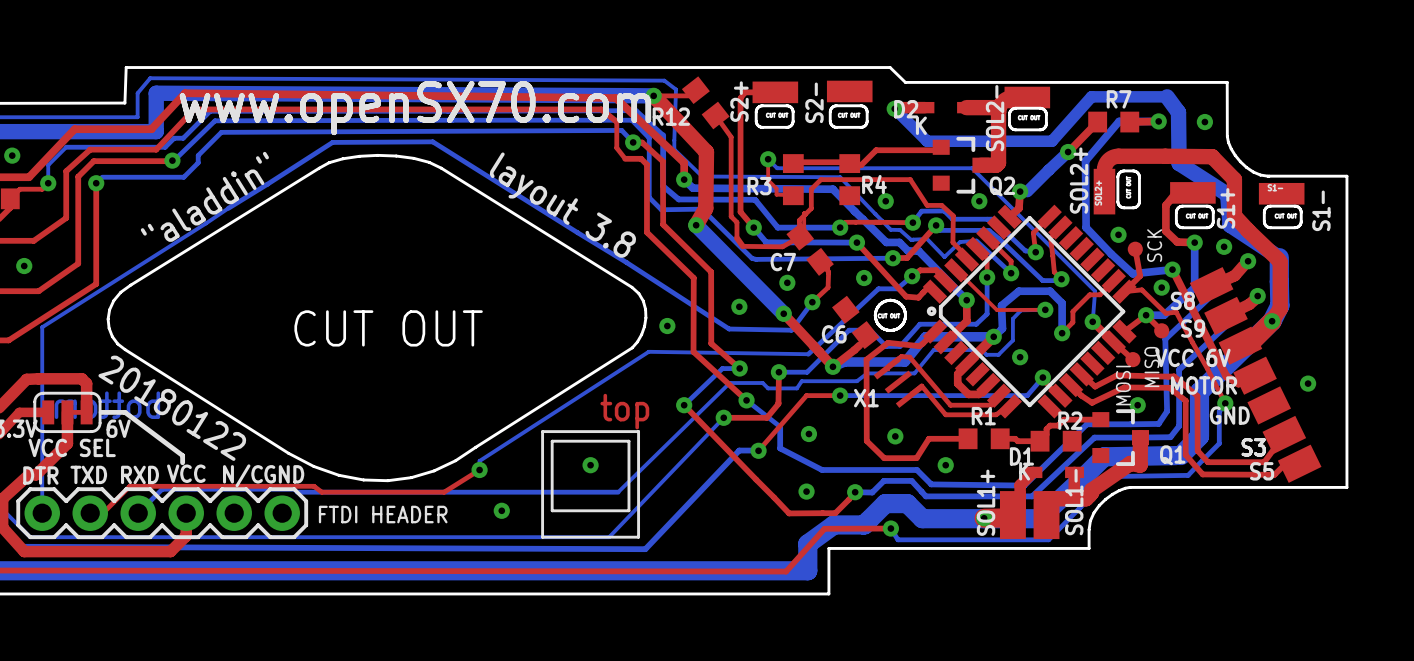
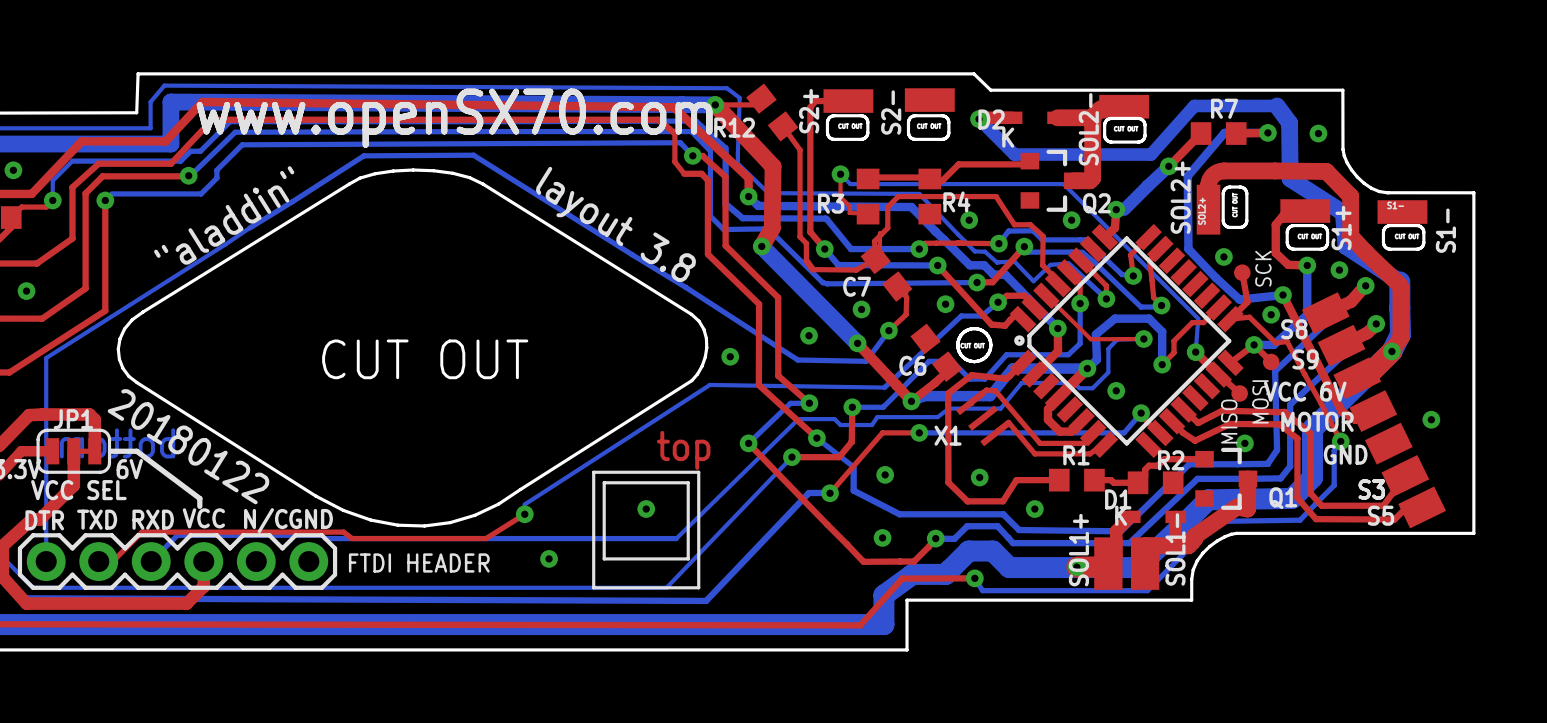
MISO name: MISO (1151, 367) -> MOSI (1260, 401)
JP1 name: none -> JP1 (73, 419)
MOSI name: MOSI (1123, 385) -> MISO (1229, 421)

